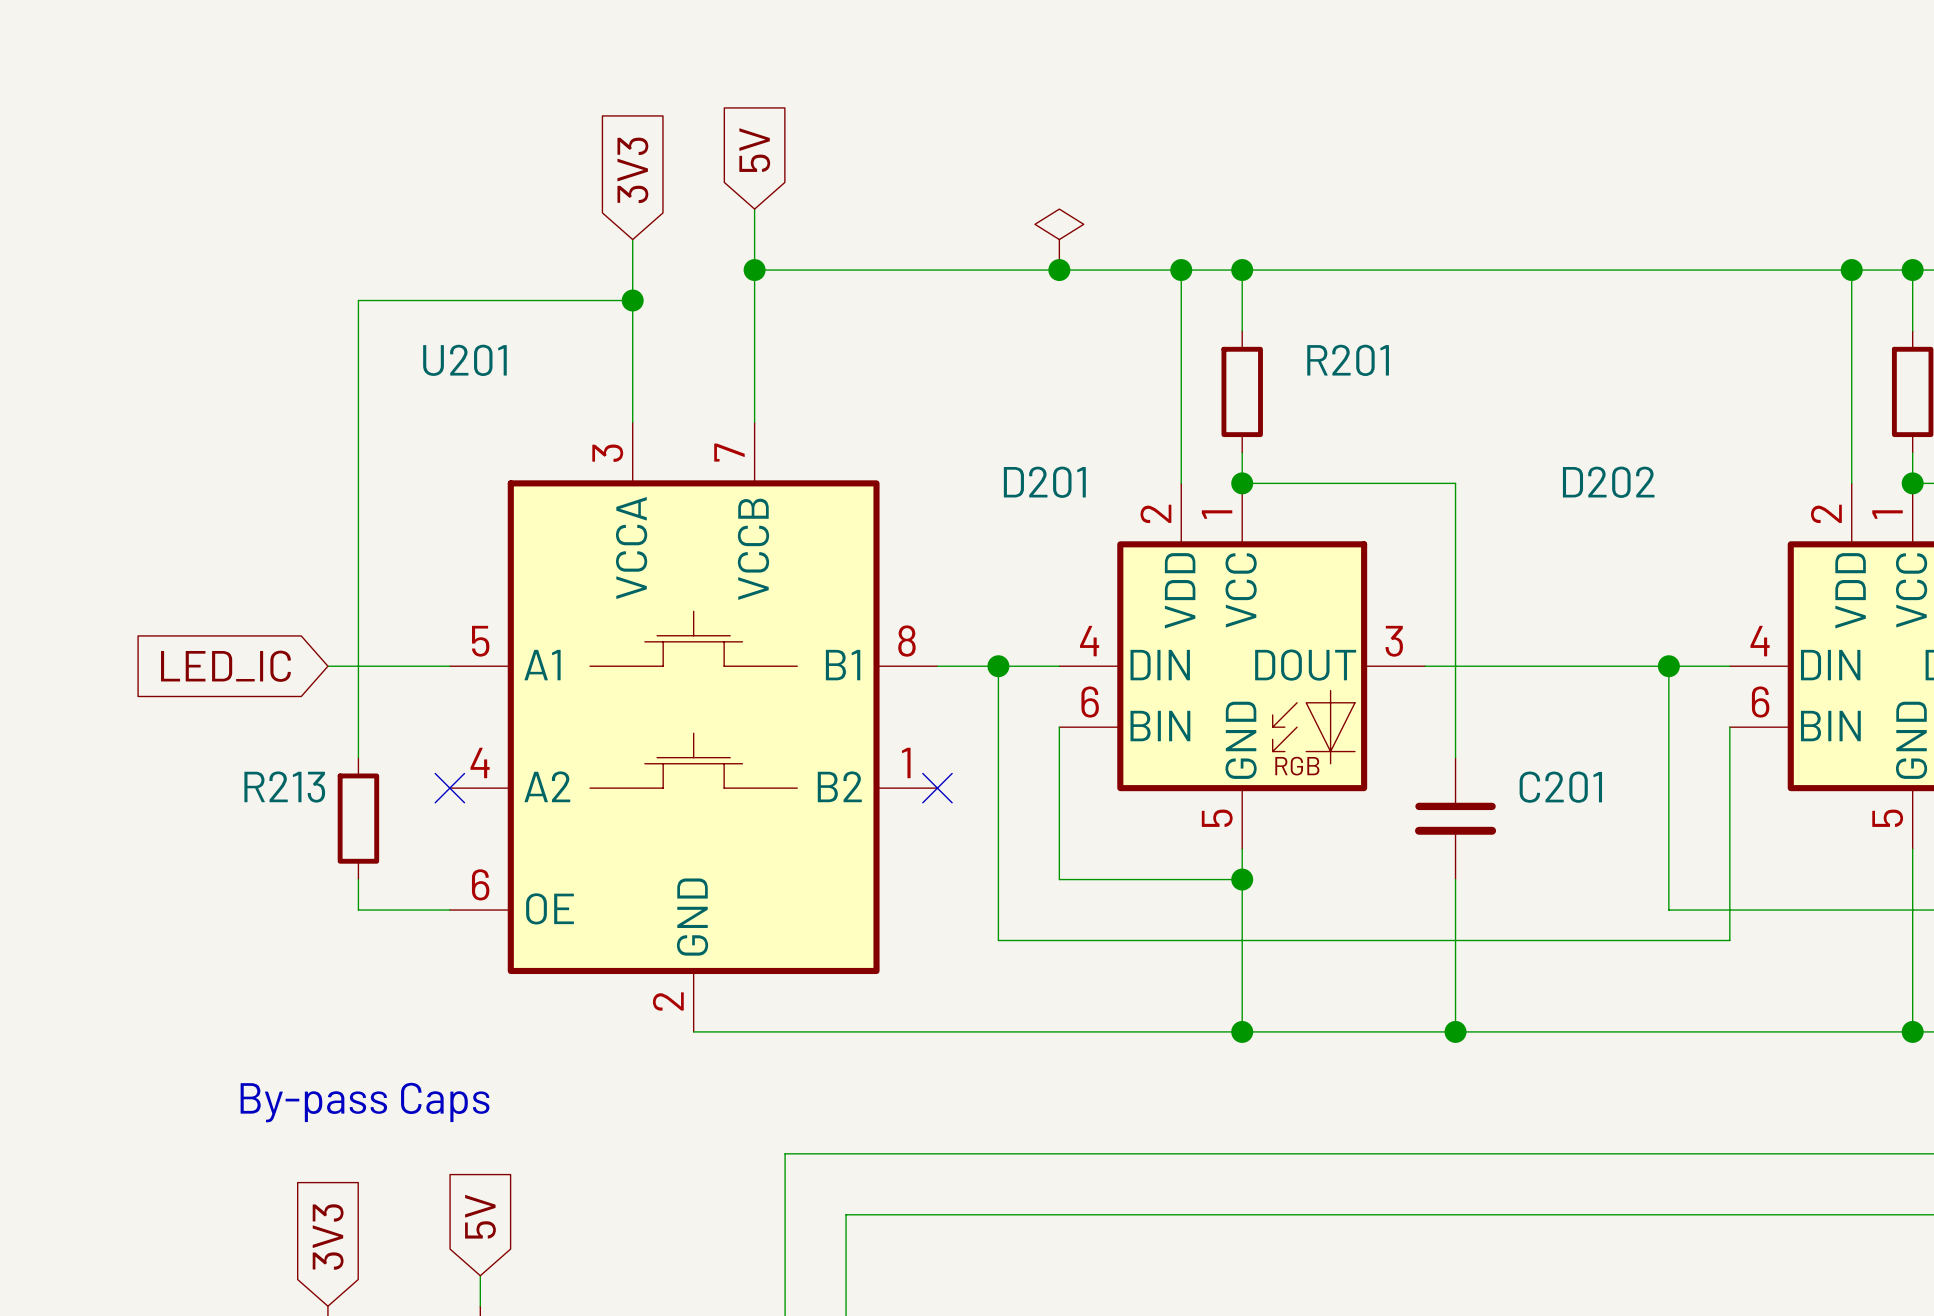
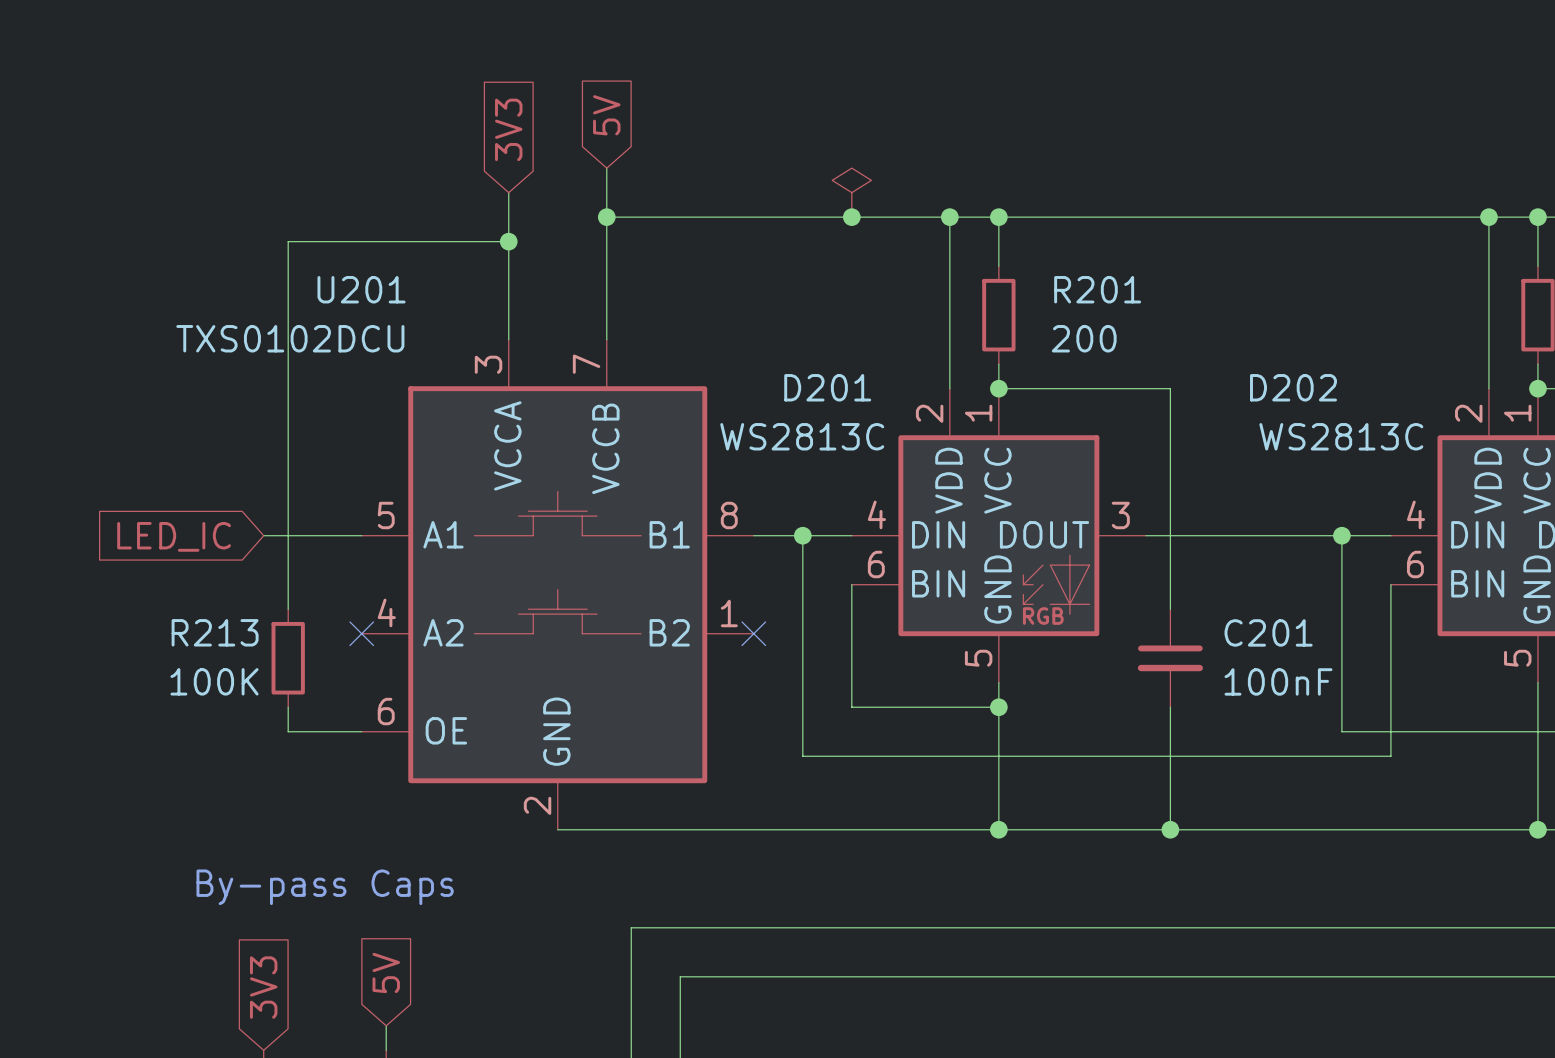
U201 value: none -> TXS0102DCU (290, 338)
R201 value: none -> 200 (1084, 338)
D201 value: none -> WS2813C (802, 436)
D202 value: none -> WS2813C (1341, 436)
R213 value: none -> 100K (214, 681)
C201 value: none -> 100nF (1278, 681)

